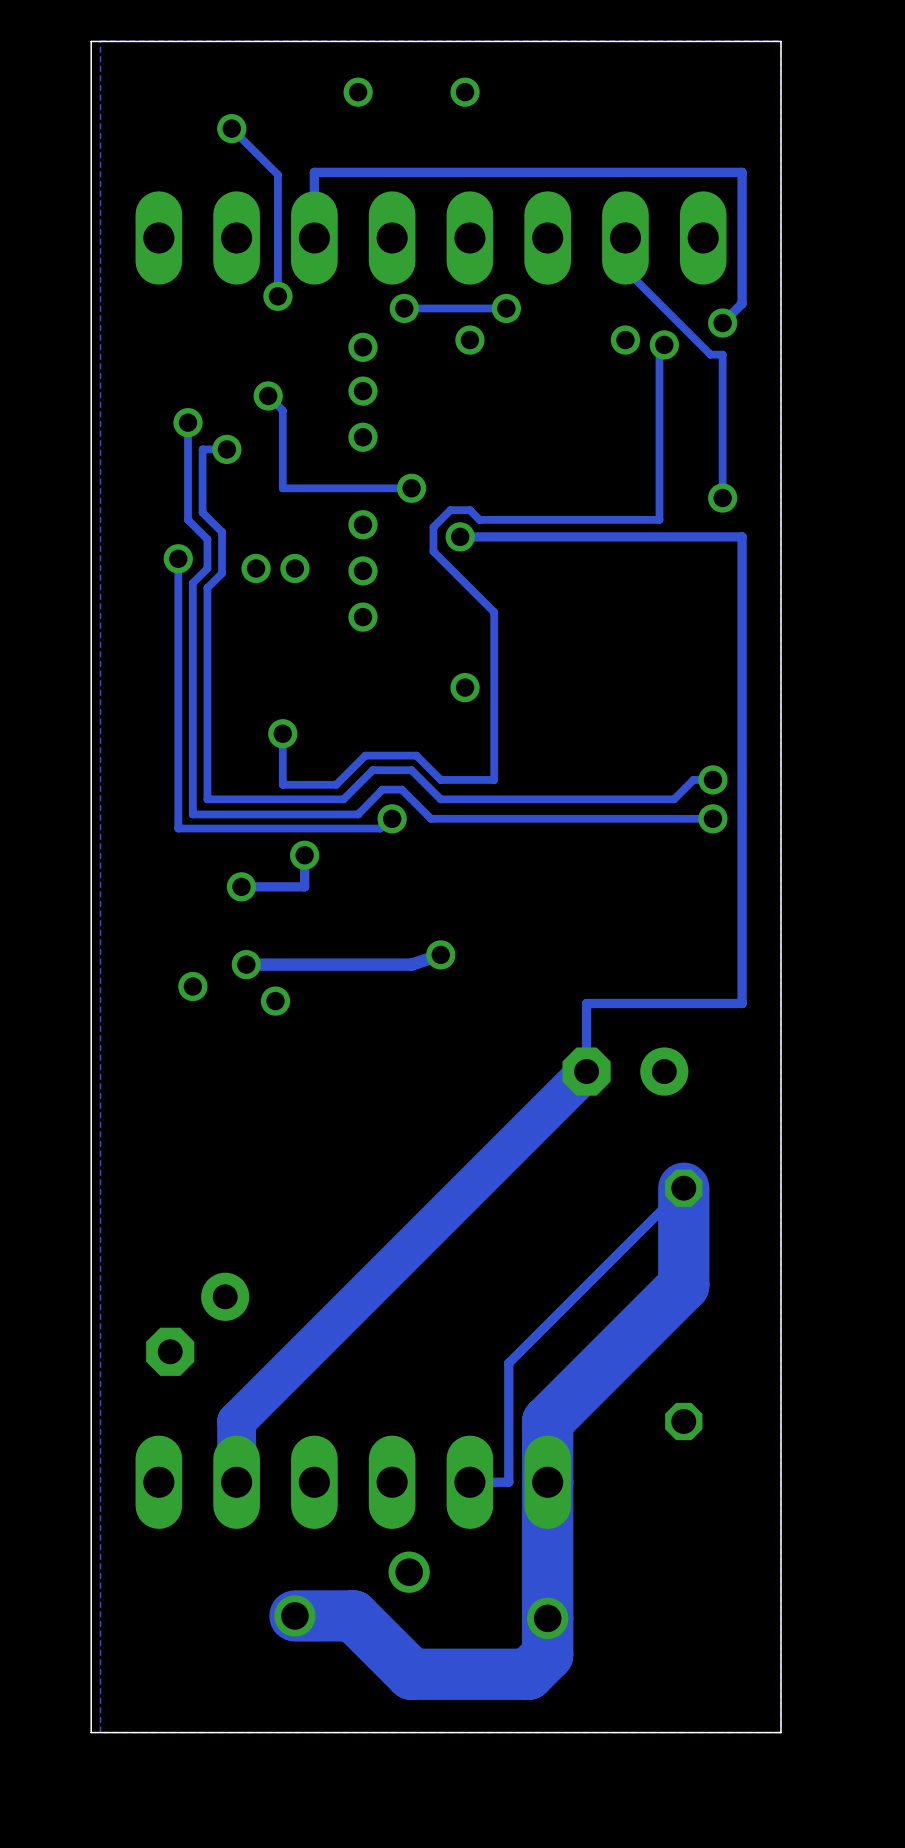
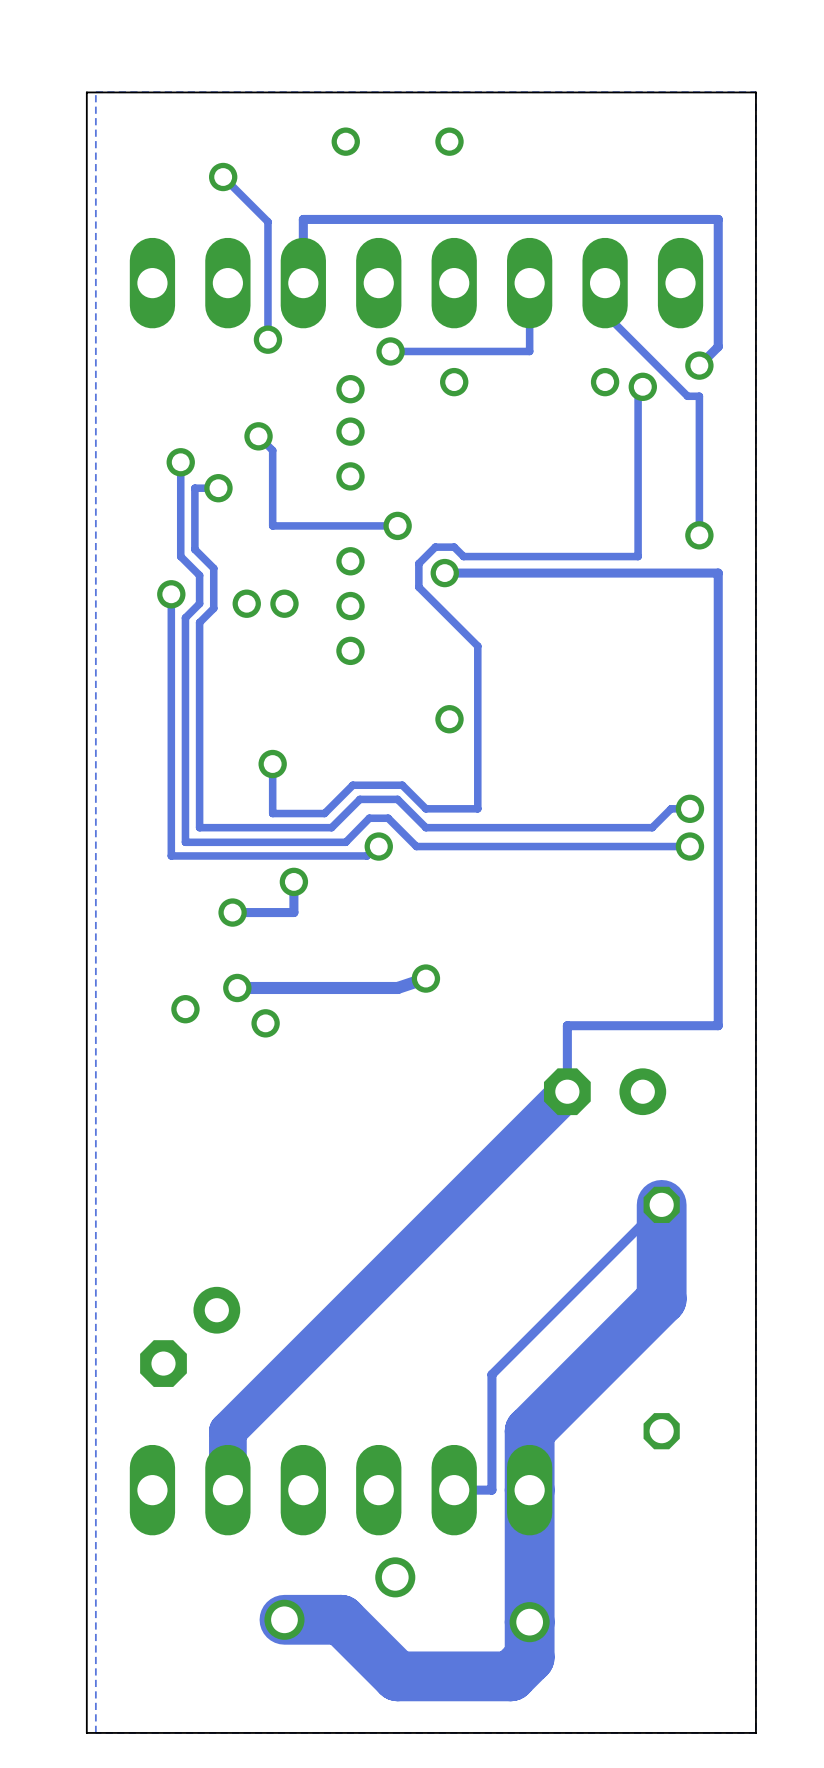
track: none -> (529, 283) (529, 351) (489, 351)
via: (506, 308) -> none

